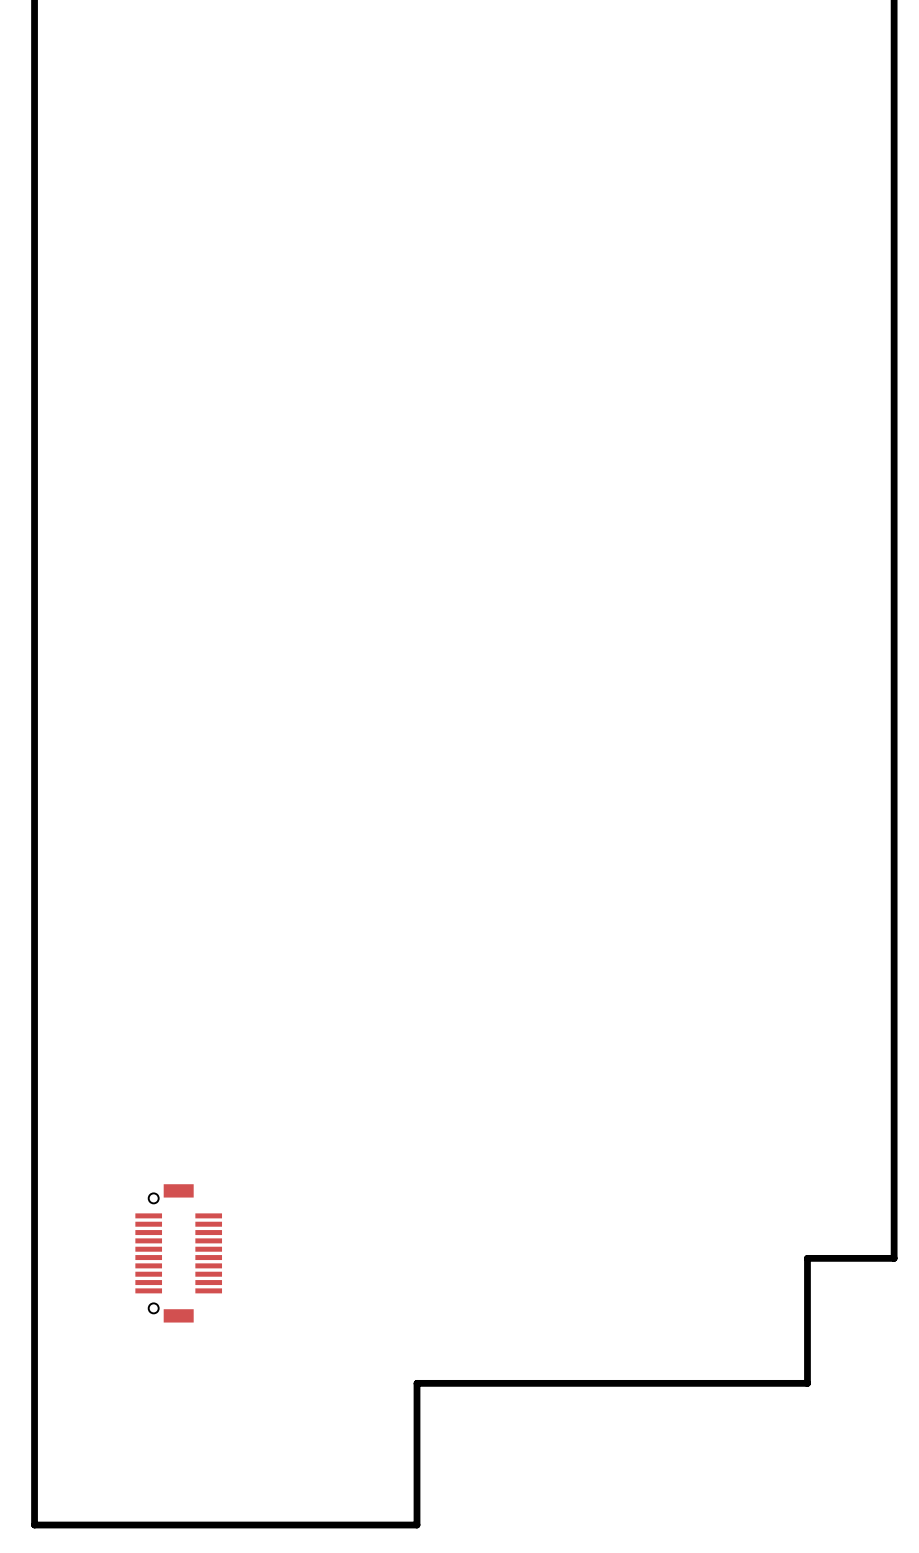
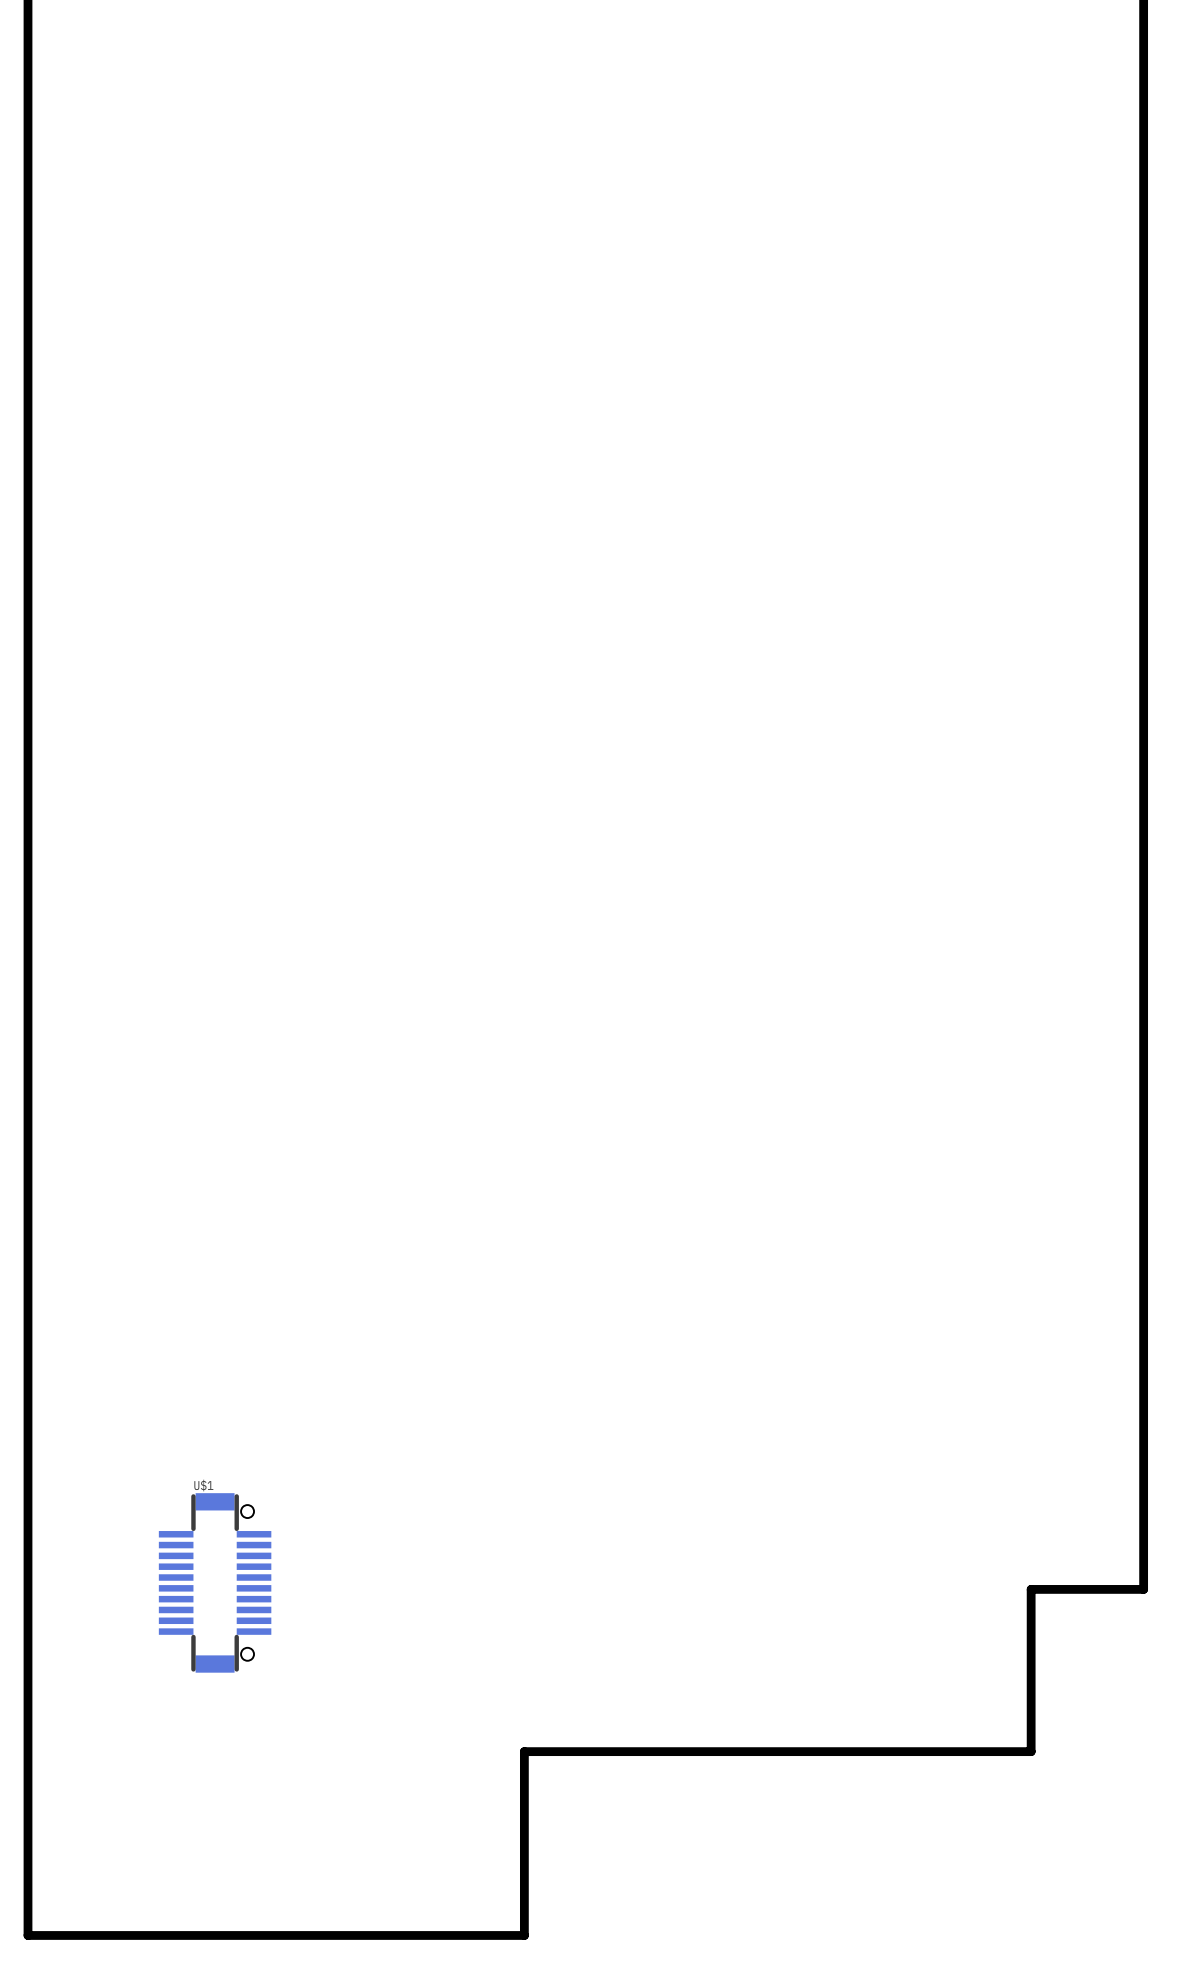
U$1 side: top (178, 1253) -> bottom (215, 1582)

